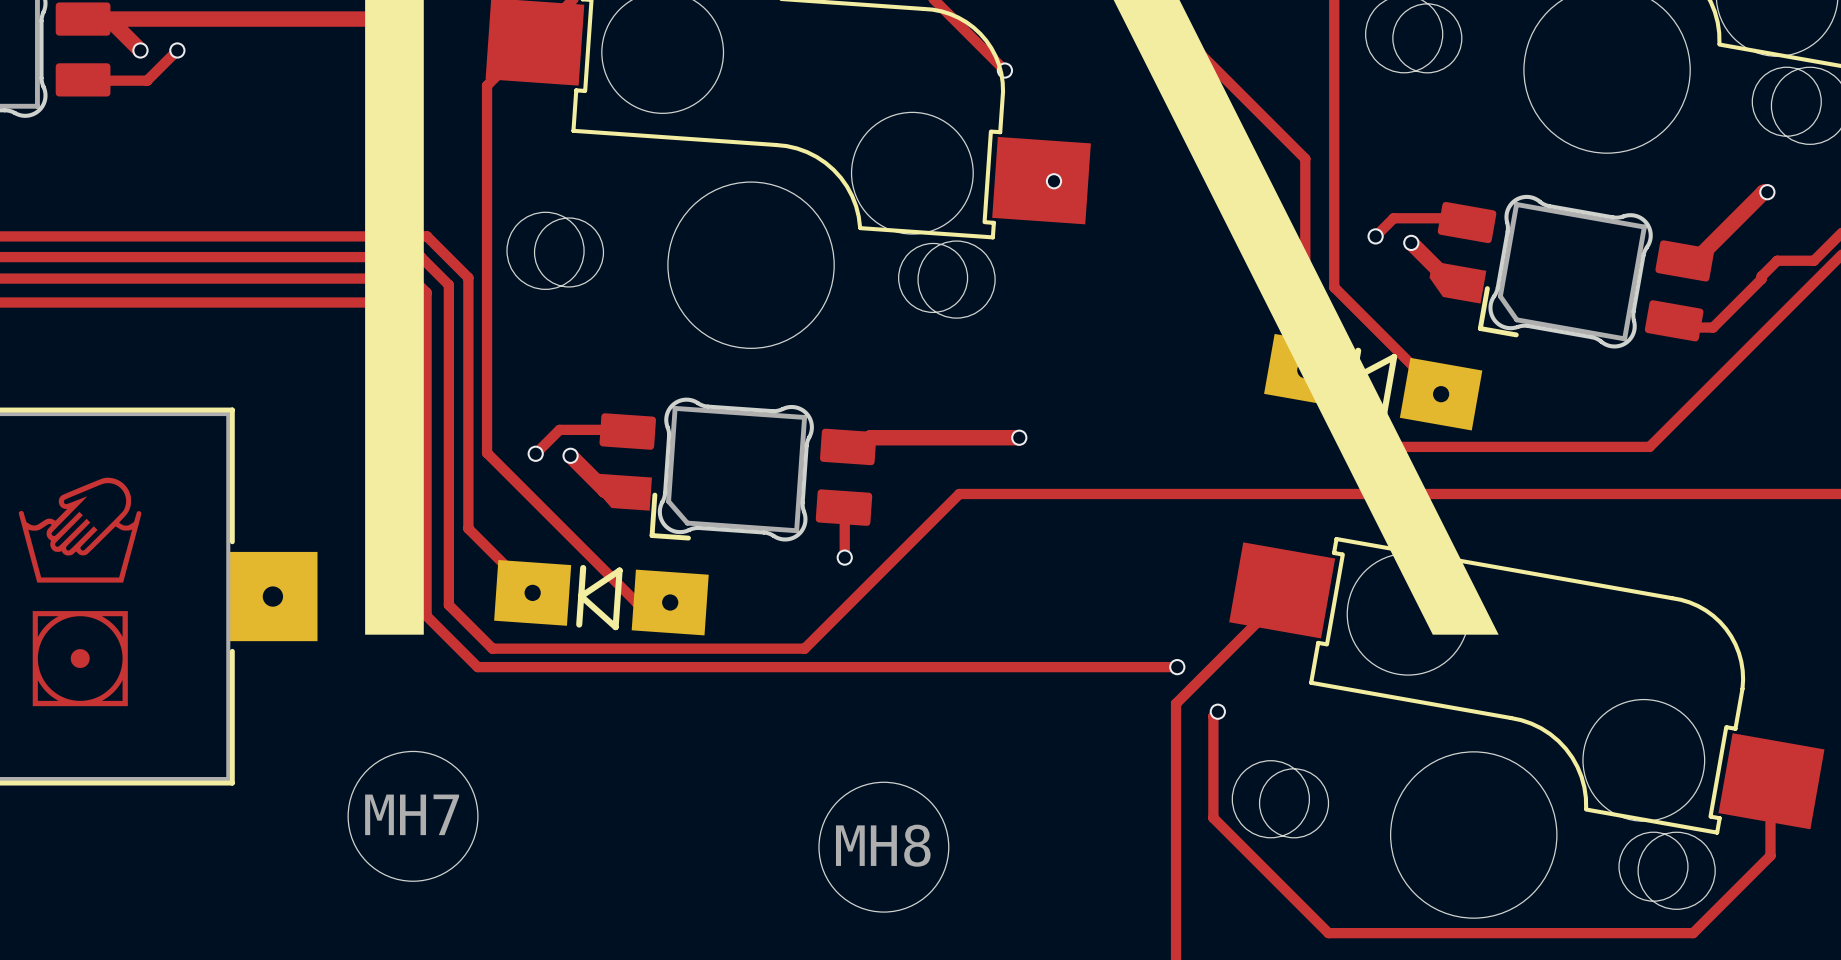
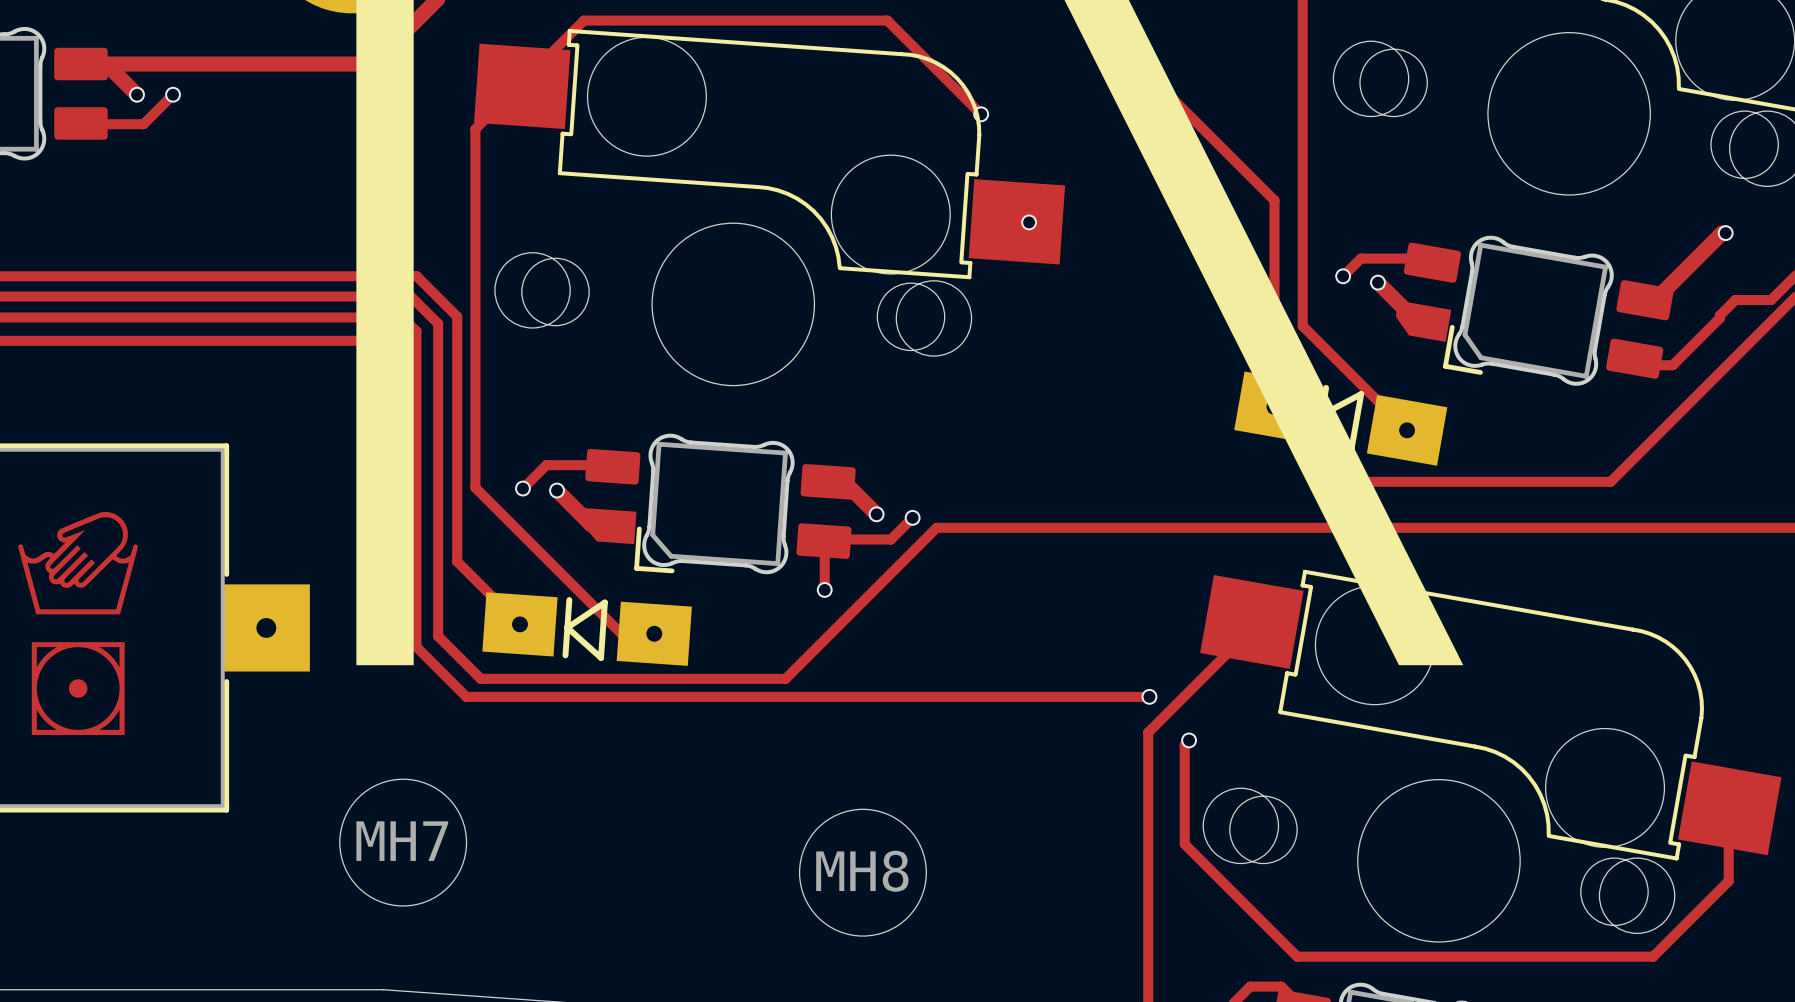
track: (1019, 437) (870, 437) (862, 445) -> (876, 514) (842, 480)
via: (1019, 437) -> none
via: none -> (876, 514)
track: none -> (912, 517) (891, 539) (821, 539)
via: none -> (912, 517)

